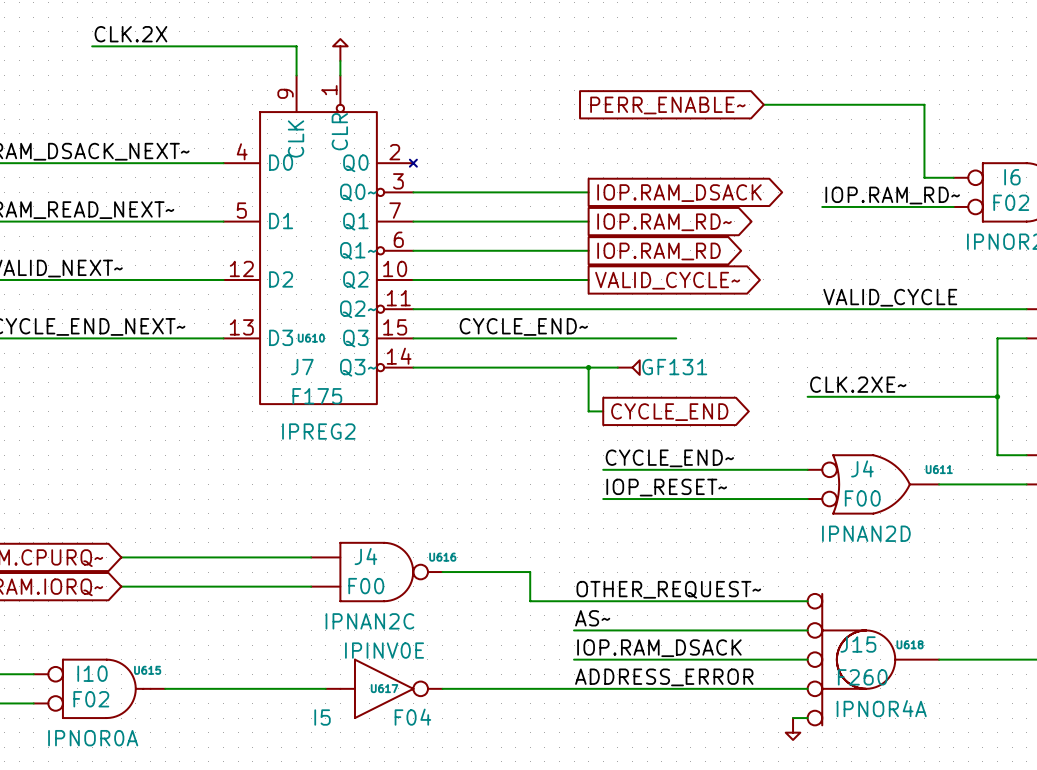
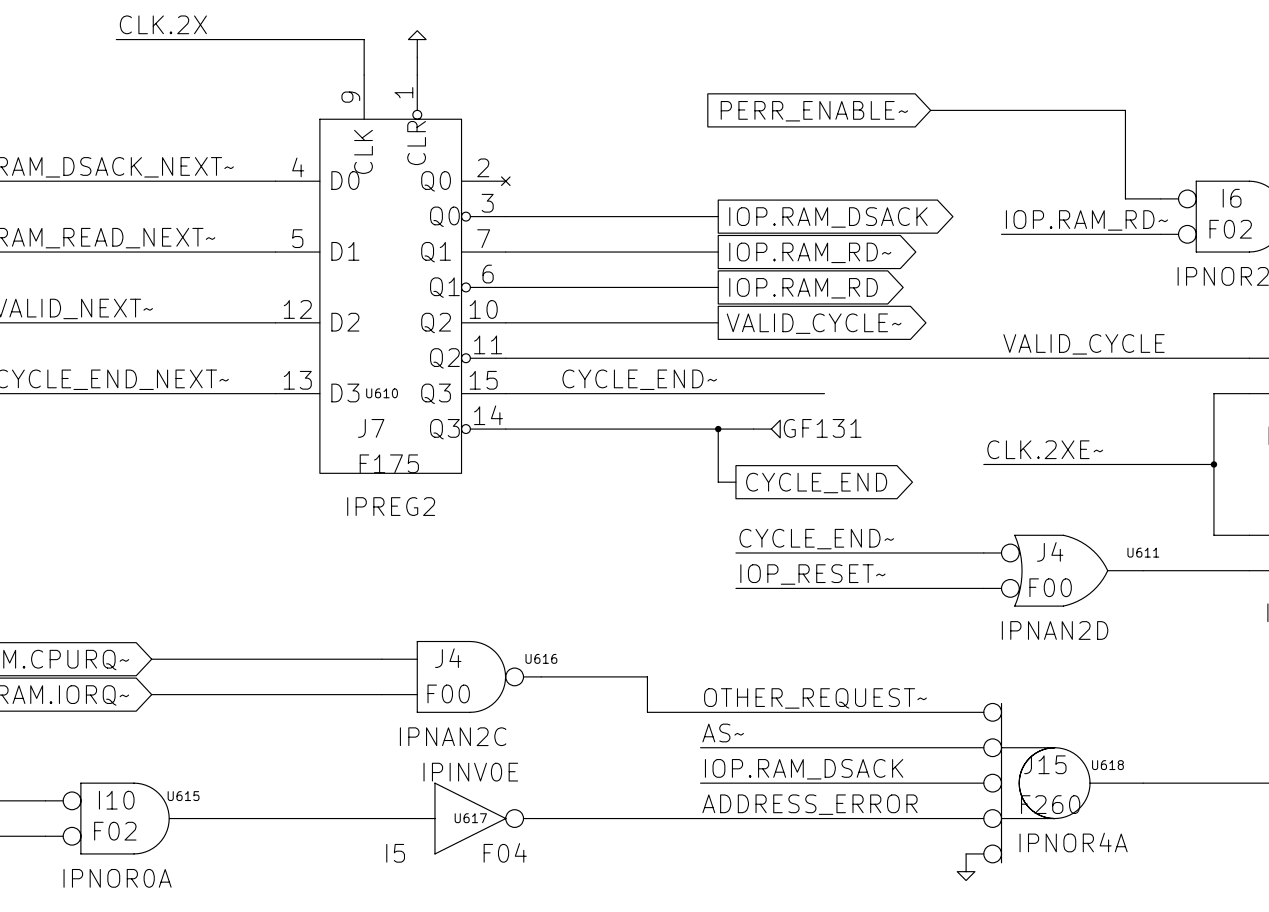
U610 pin name: Q0~ (358, 192) -> Q0 (444, 216)
U610 pin name: Q1~ (358, 250) -> Q1 (444, 287)
U610 pin name: Q2~ (358, 309) -> Q2 (444, 358)
U610 pin name: Q3~ (358, 367) -> Q3 (444, 429)

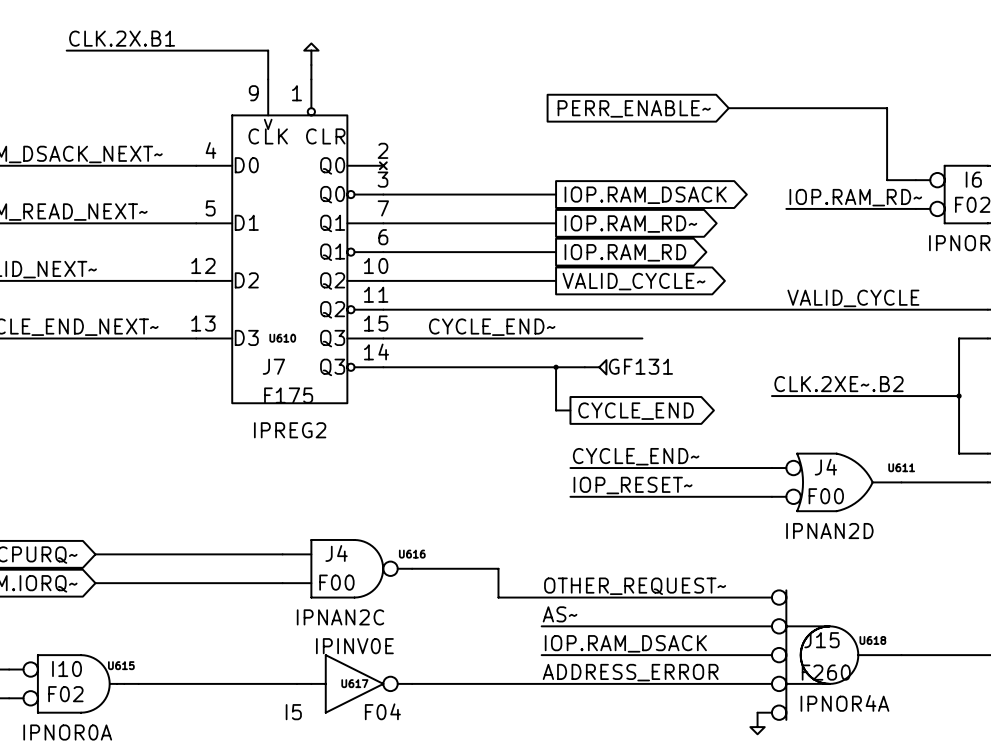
label: CLK.2X (163, 24) -> CLK.2X.B1 (122, 38)
U610 symbol: [275, 74, 506, 474] -> [196, 79, 384, 404]
label: CLK.2XE~ (1045, 449) -> CLK.2XE~.B2 (839, 384)

